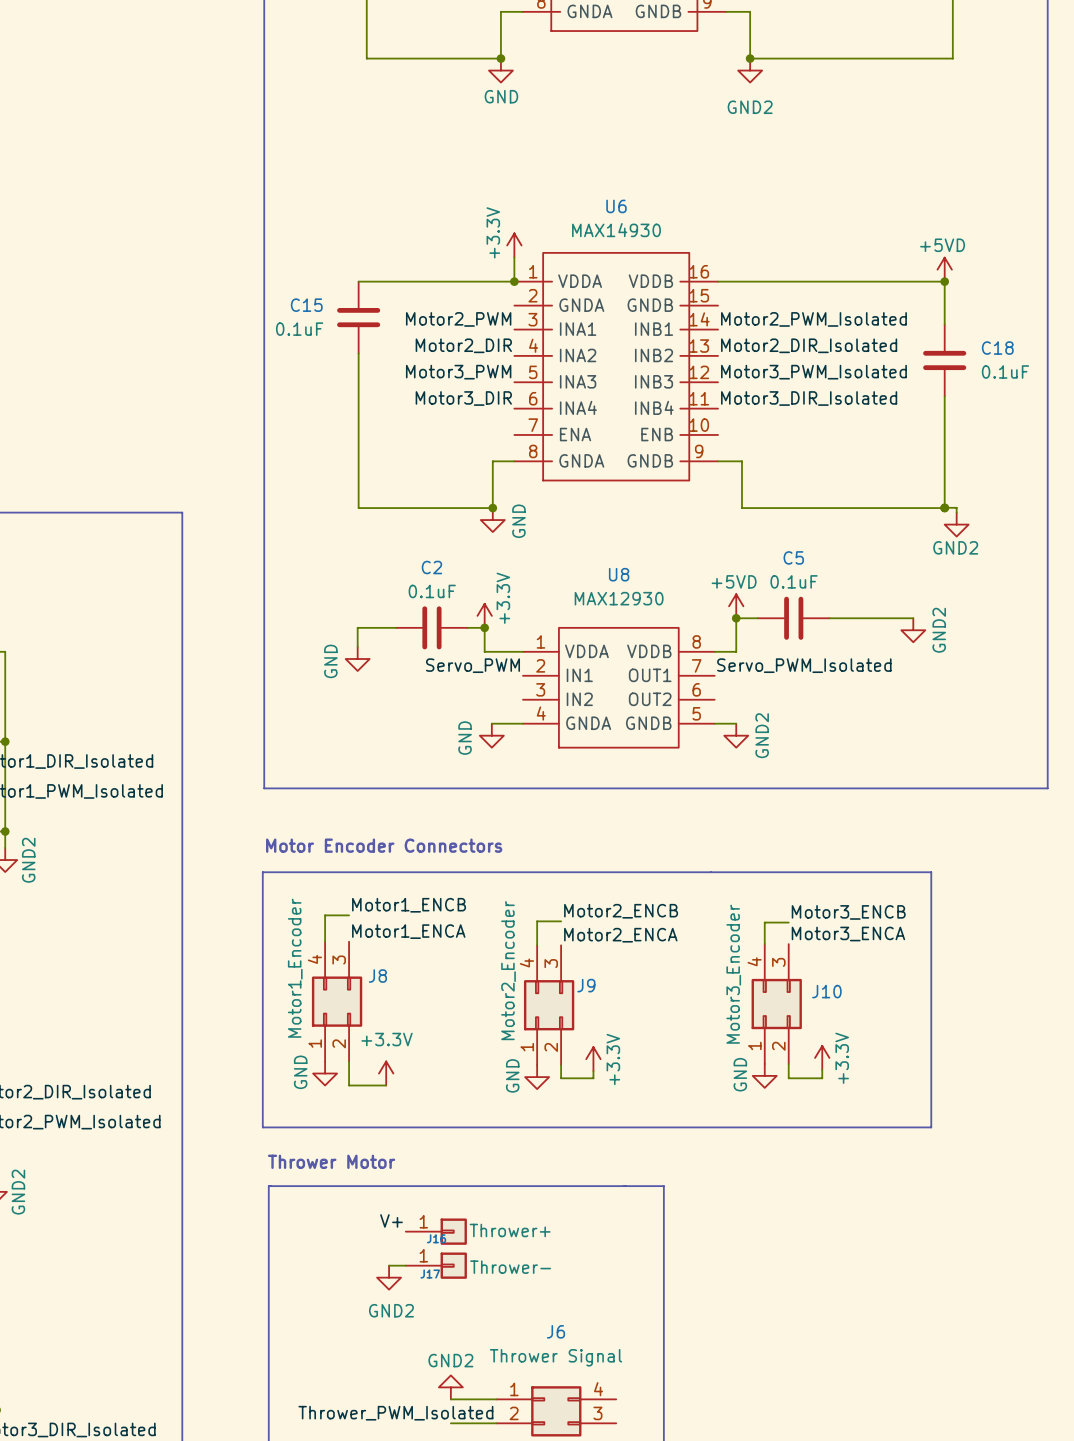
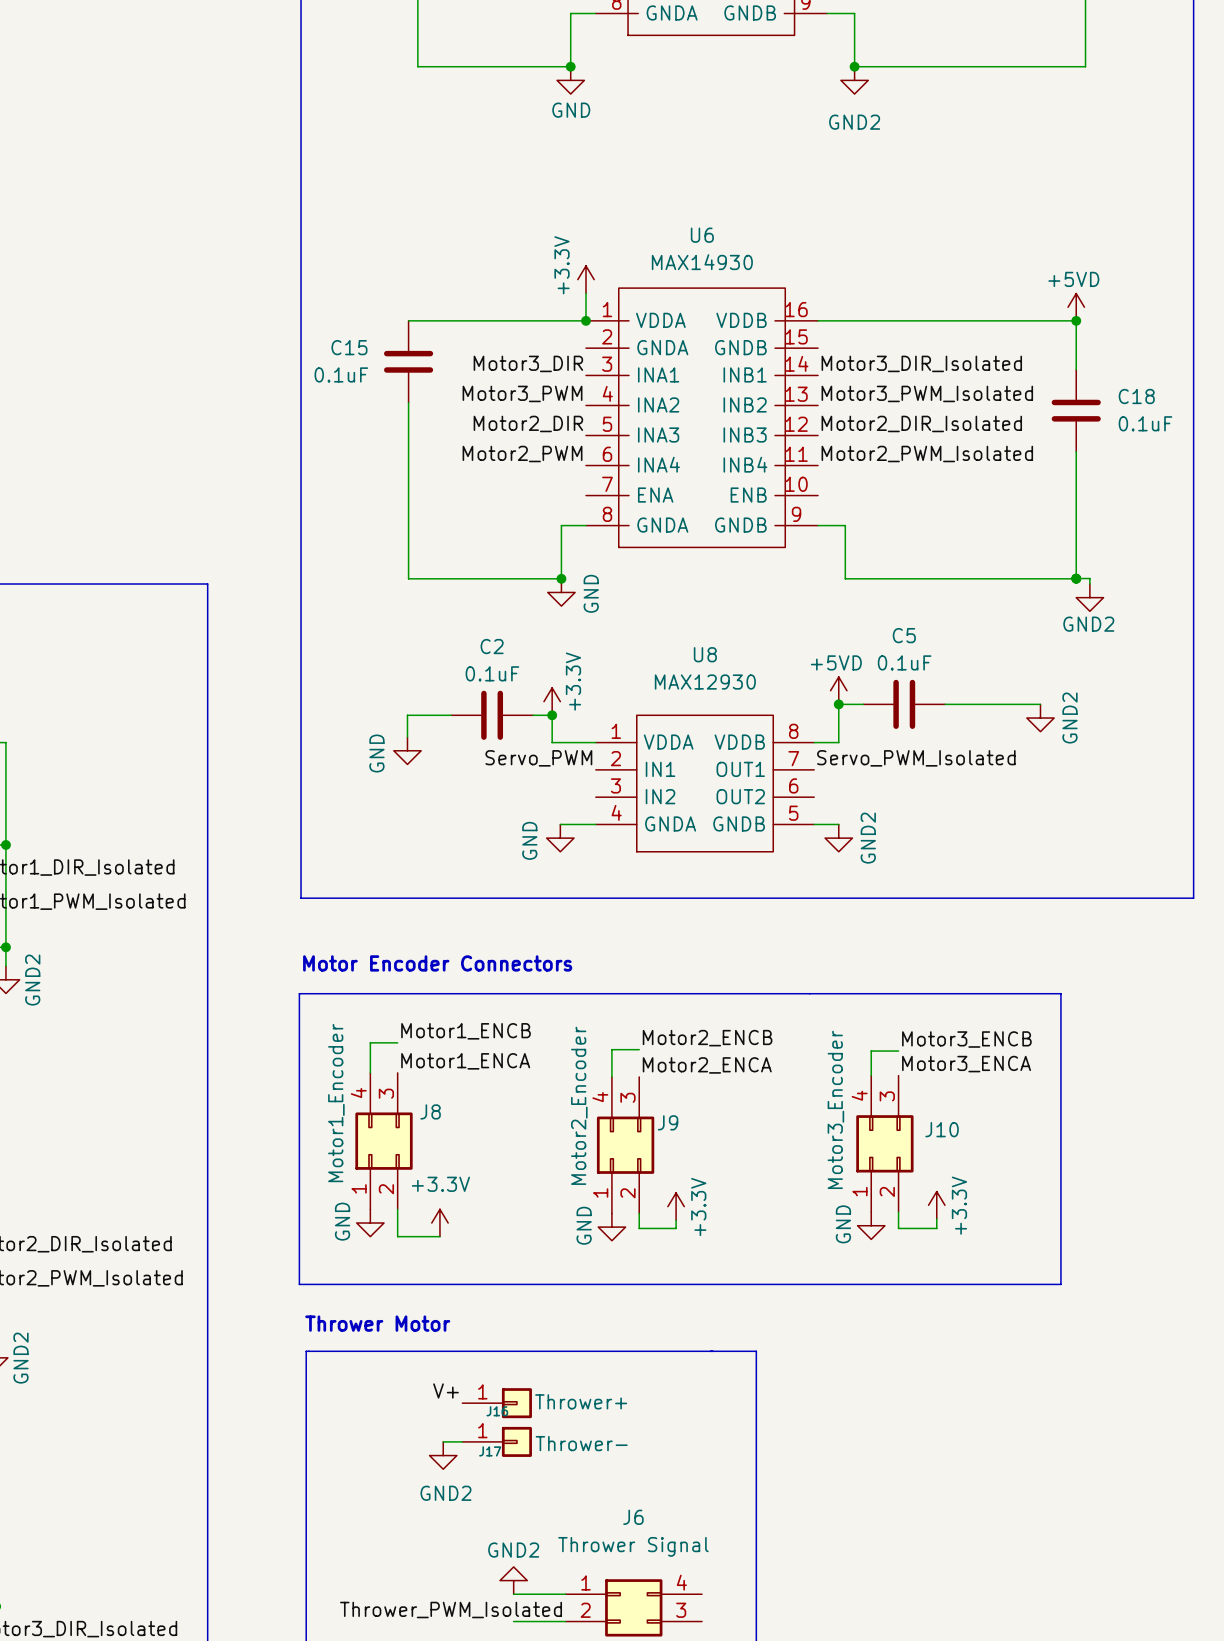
label: Motor2_PWM (458, 319) -> Motor3_DIR (528, 363)
label: Motor2_PWM_Isolated (813, 319) -> Motor3_DIR_Isolated (921, 363)
label: Motor2_DIR (463, 345) -> Motor3_PWM (522, 393)
label: Motor2_DIR_Isolated (809, 345) -> Motor3_PWM_Isolated (927, 393)
label: Motor3_PWM (458, 372) -> Motor2_DIR (528, 423)
label: Motor3_PWM_Isolated (813, 372) -> Motor2_DIR_Isolated (921, 423)
label: Motor3_DIR (463, 398) -> Motor2_PWM (522, 454)
label: Motor3_DIR_Isolated (809, 398) -> Motor2_PWM_Isolated (927, 454)

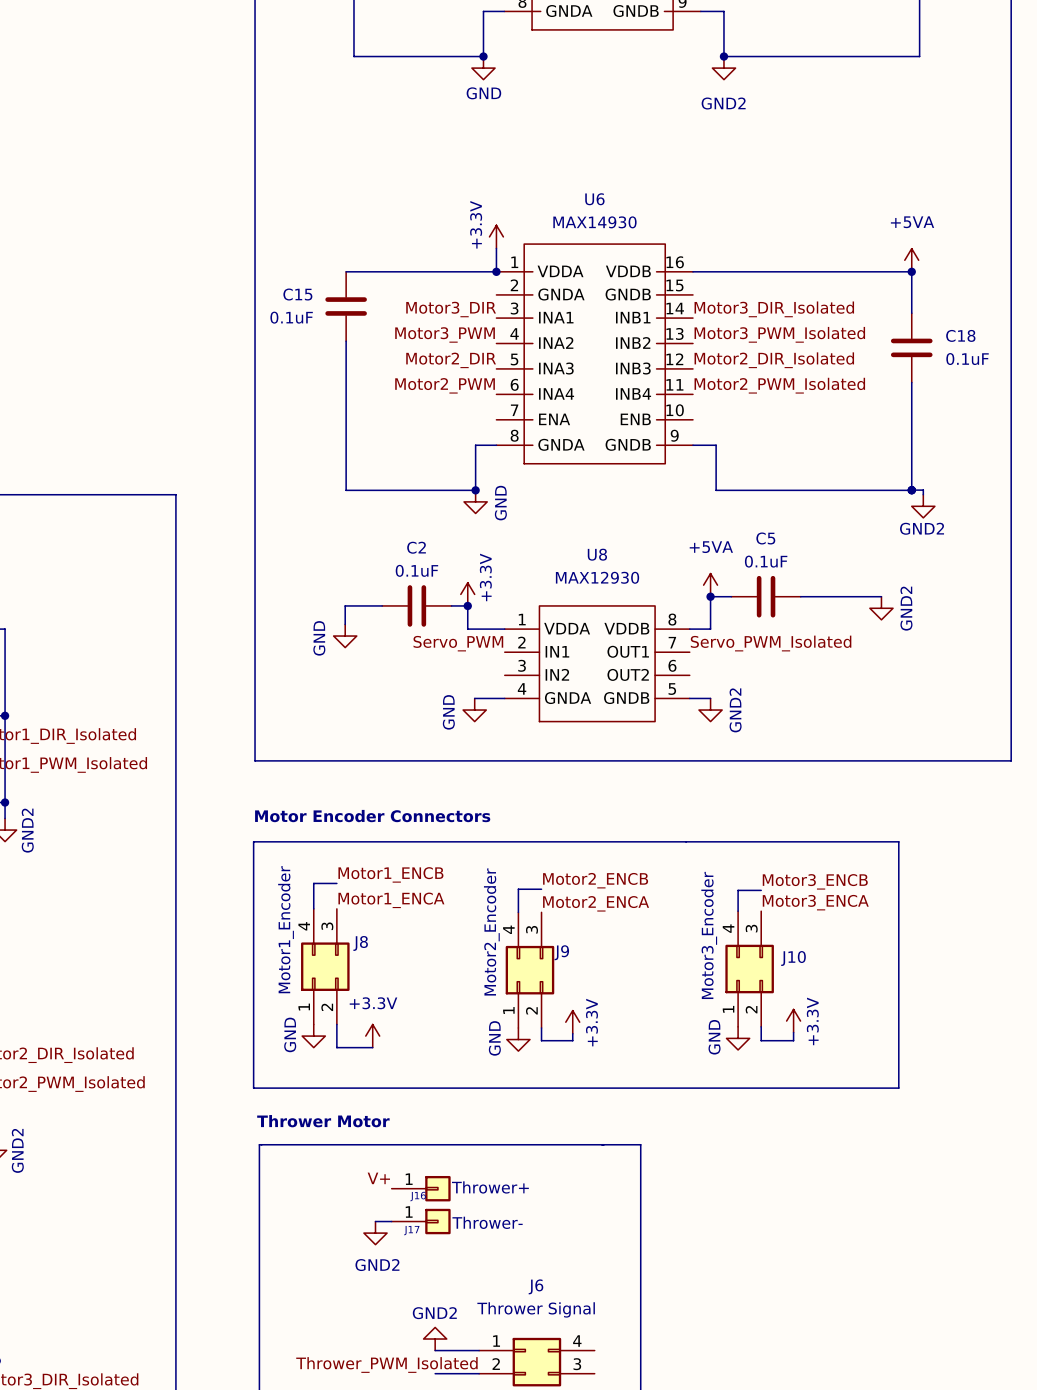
power symbol: +5VD (1076, 307) -> +5VA (911, 260)
power symbol: +5VD (838, 690) -> +5VA (710, 585)

